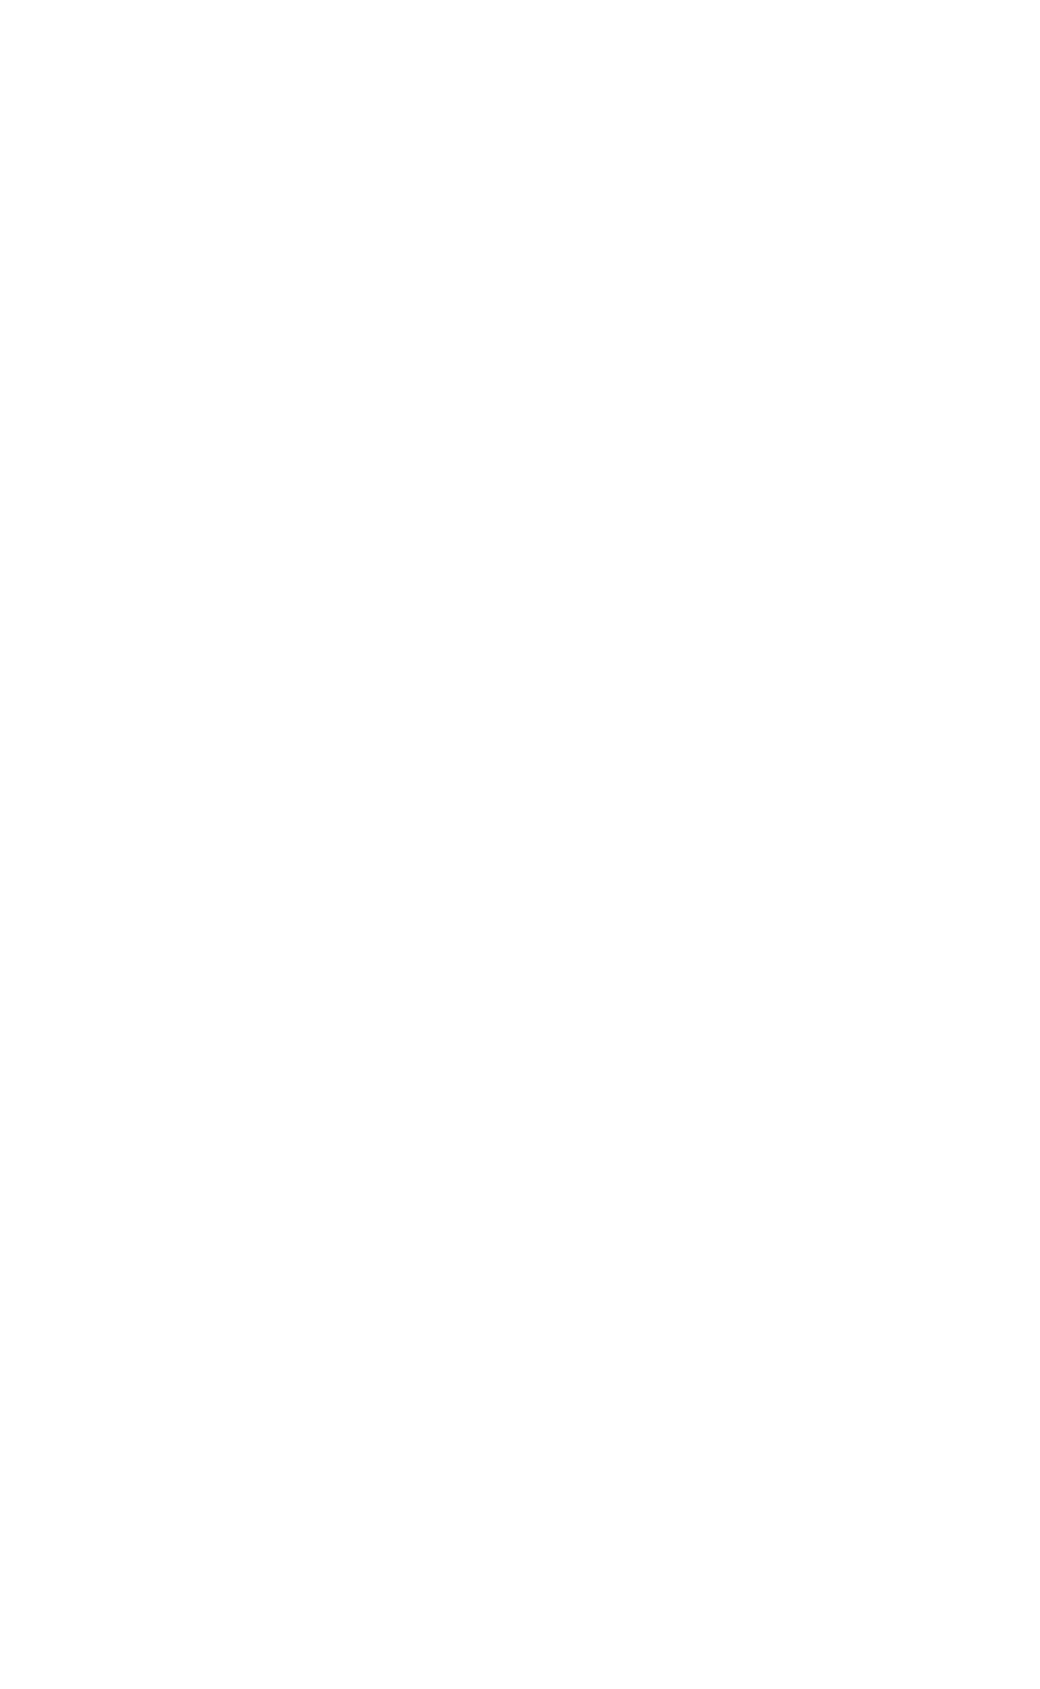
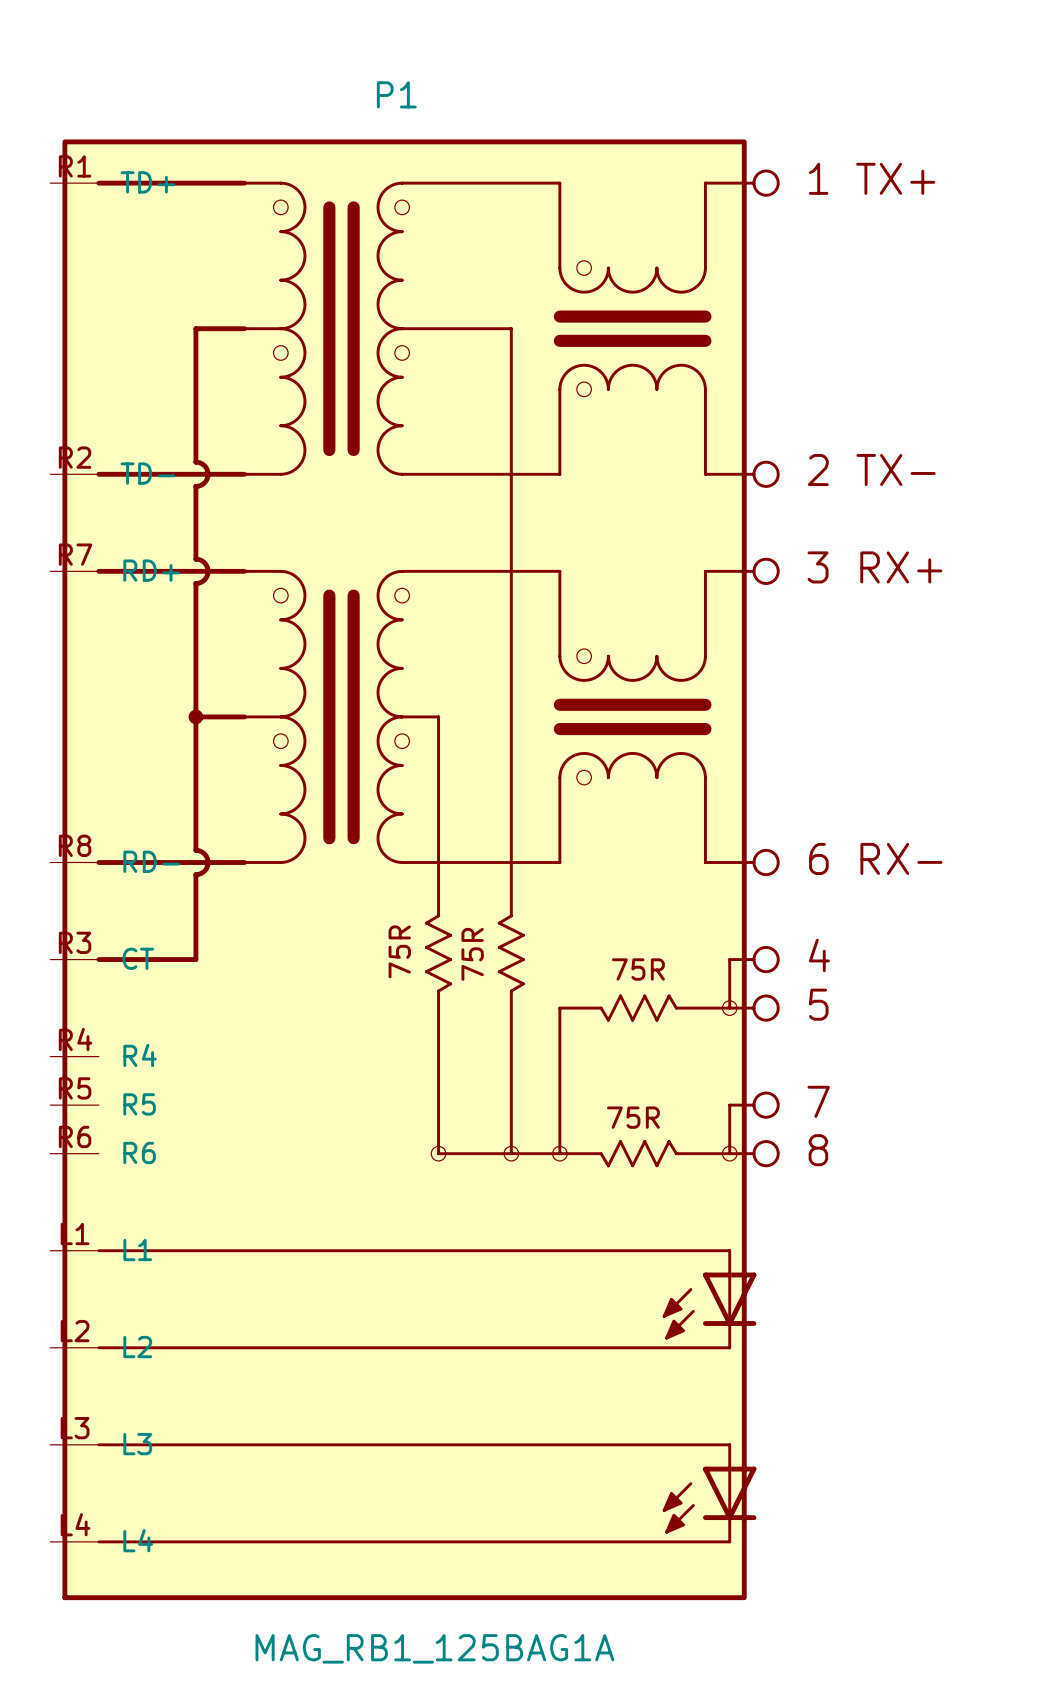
P1: none -> MAG_RB1_125BAG1A (415, 869)

